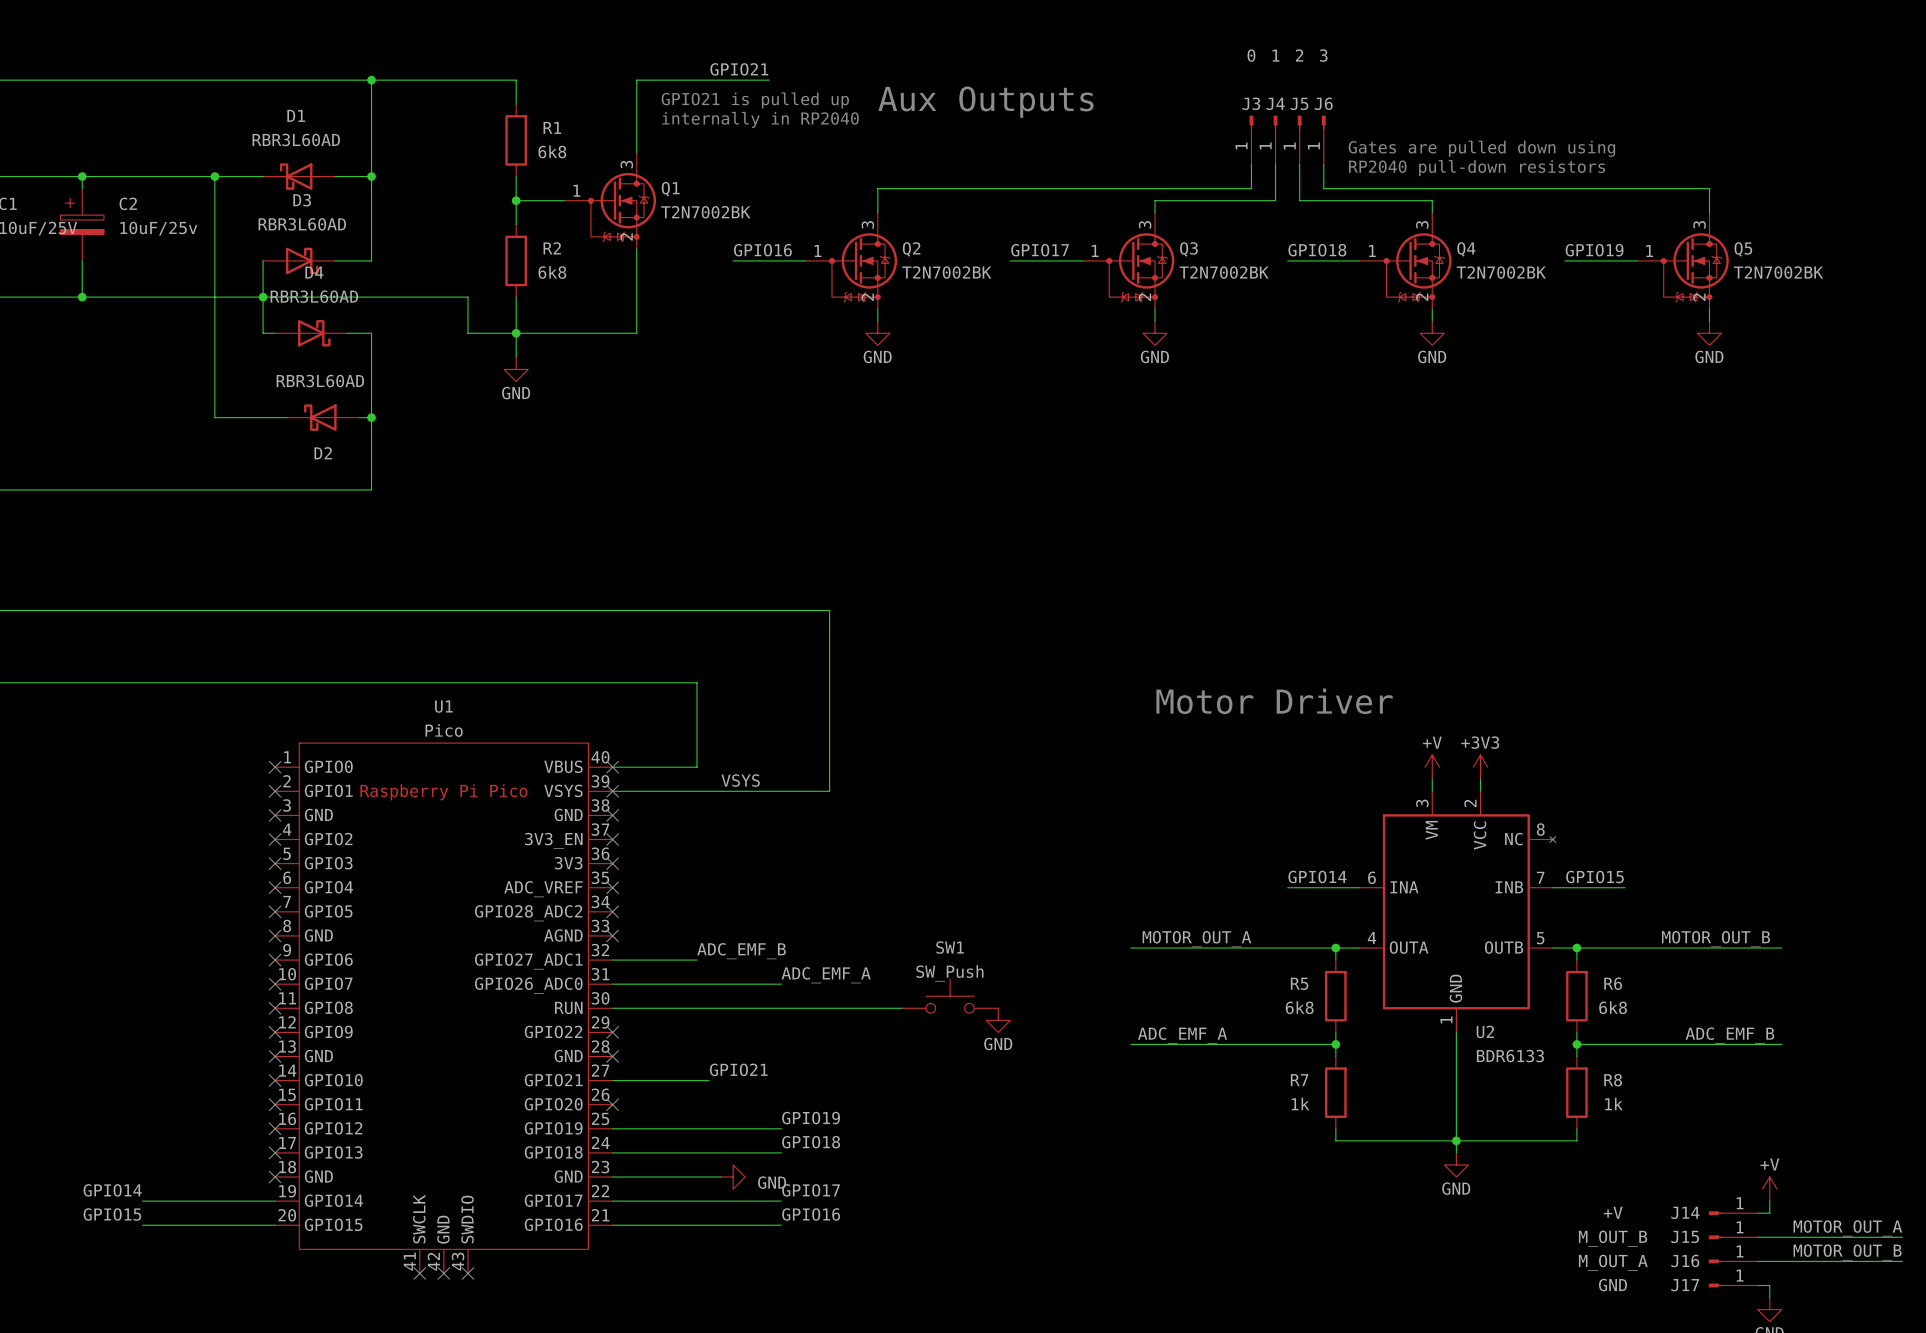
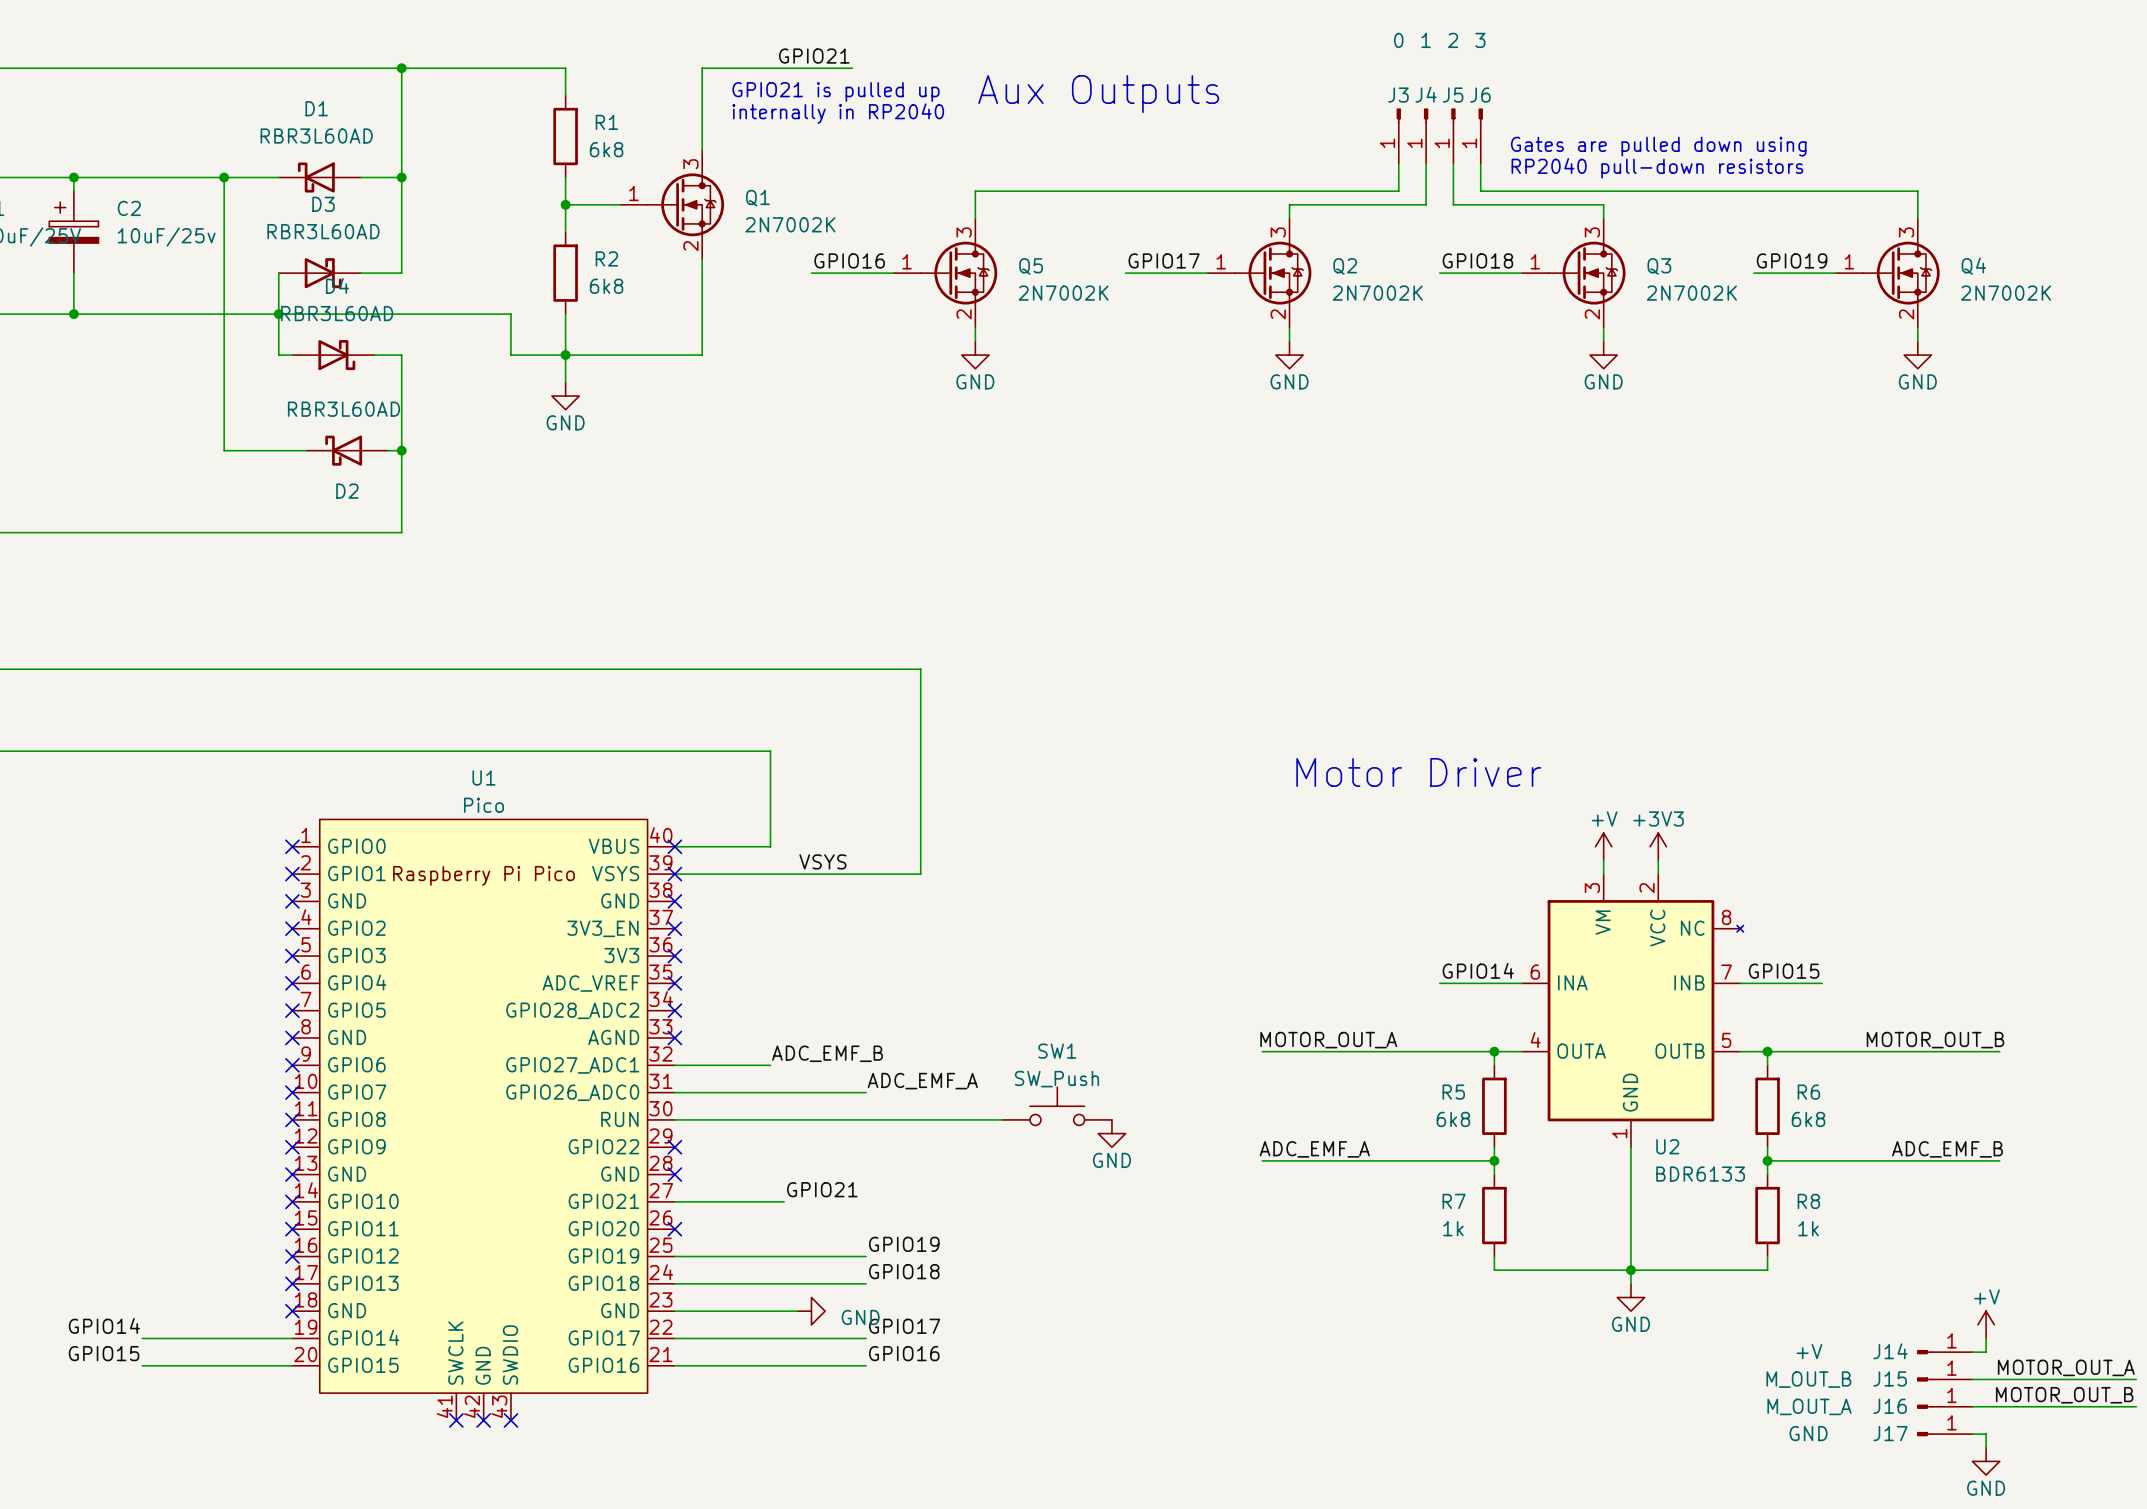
Q1 symbol: [564, 152, 657, 249] -> [620, 150, 725, 260]
Q1 value: T2N7002BK (705, 212) -> 2N7002K (790, 224)
Q2 symbol: [805, 212, 898, 310] -> [1207, 218, 1312, 328]
Q3 symbol: [1082, 212, 1175, 310] -> [1521, 218, 1626, 328]
Q4 symbol: [1359, 212, 1452, 310] -> [1835, 218, 1940, 328]
Q5 symbol: [1637, 212, 1729, 310] -> [893, 218, 998, 328]
Q2 value: T2N7002BK (946, 272) -> 2N7002K (1377, 293)
Q3 value: T2N7002BK (1224, 272) -> 2N7002K (1691, 293)
Q4 value: T2N7002BK (1501, 272) -> 2N7002K (2006, 293)
Q5 value: T2N7002BK (1778, 272) -> 2N7002K (1063, 293)

